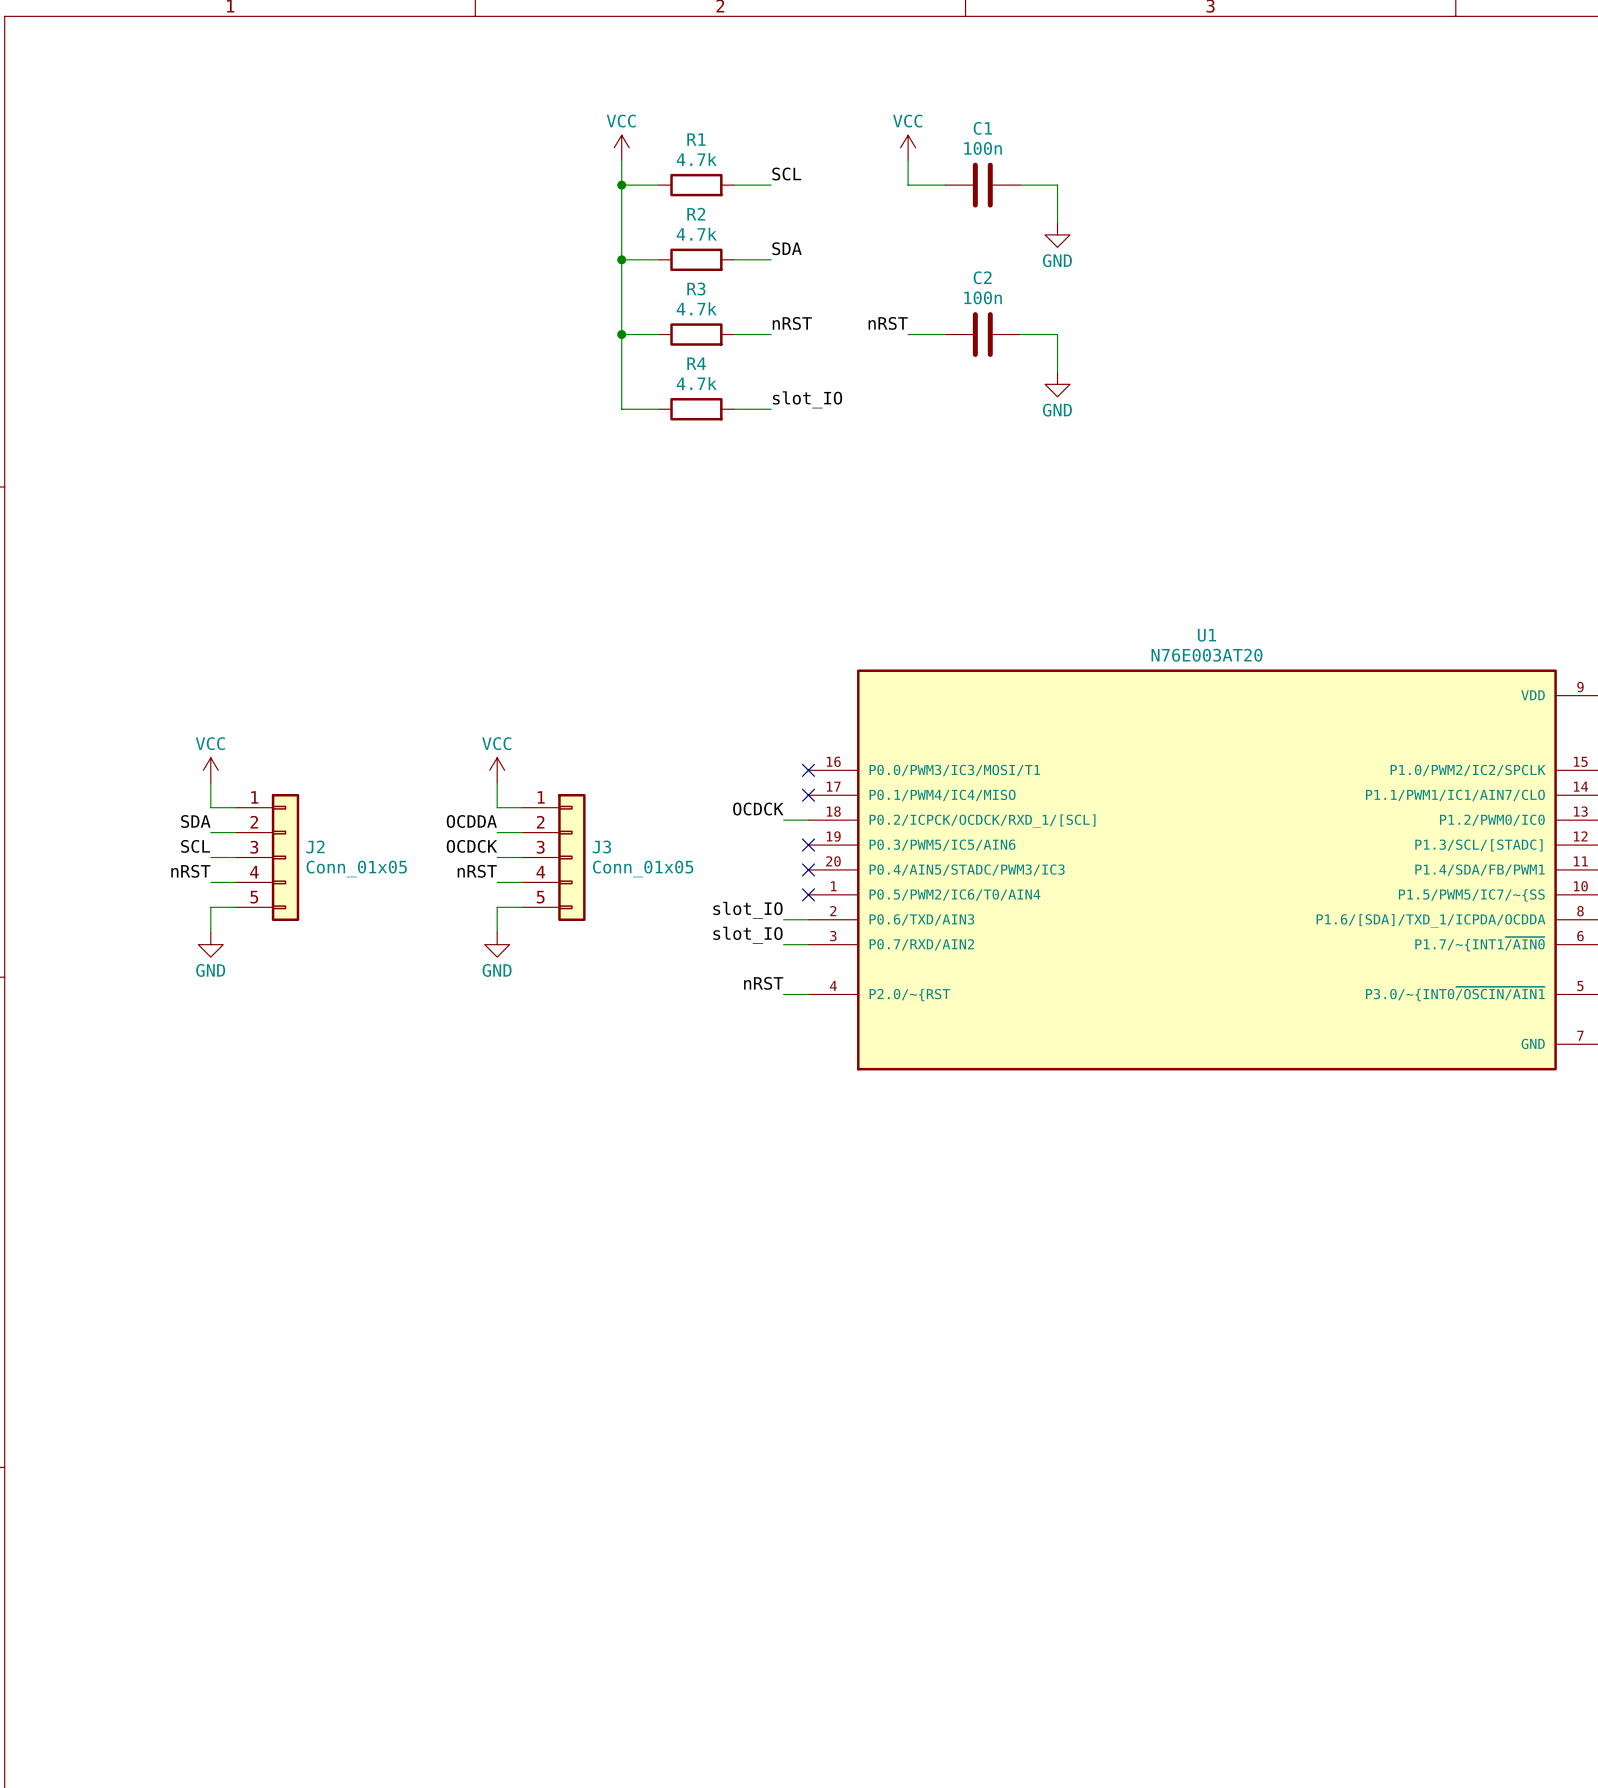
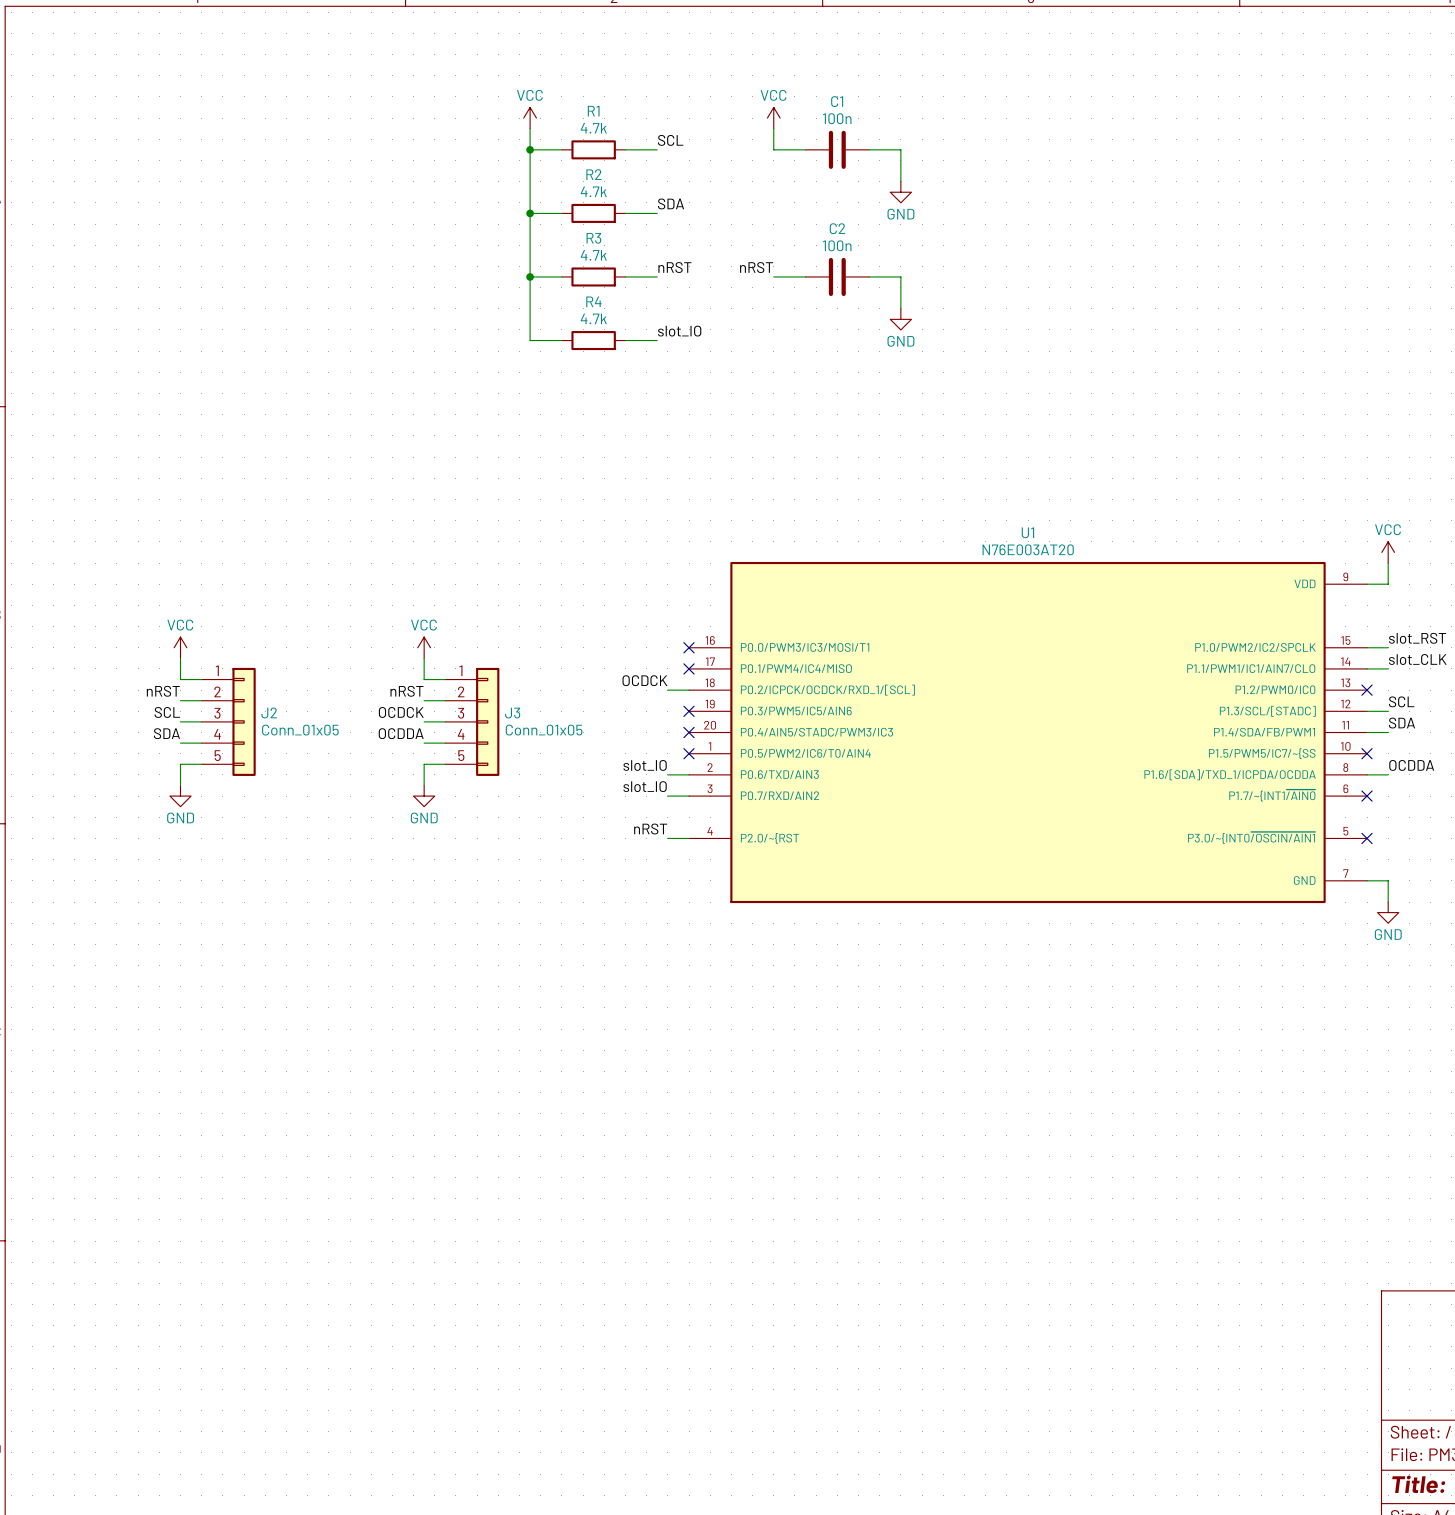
label: SDA (195, 821) -> nRST (163, 691)
label: OCDDA (471, 821) -> nRST (407, 691)
label: nRST (190, 871) -> SDA (166, 733)
label: nRST (477, 871) -> OCDDA (401, 733)

